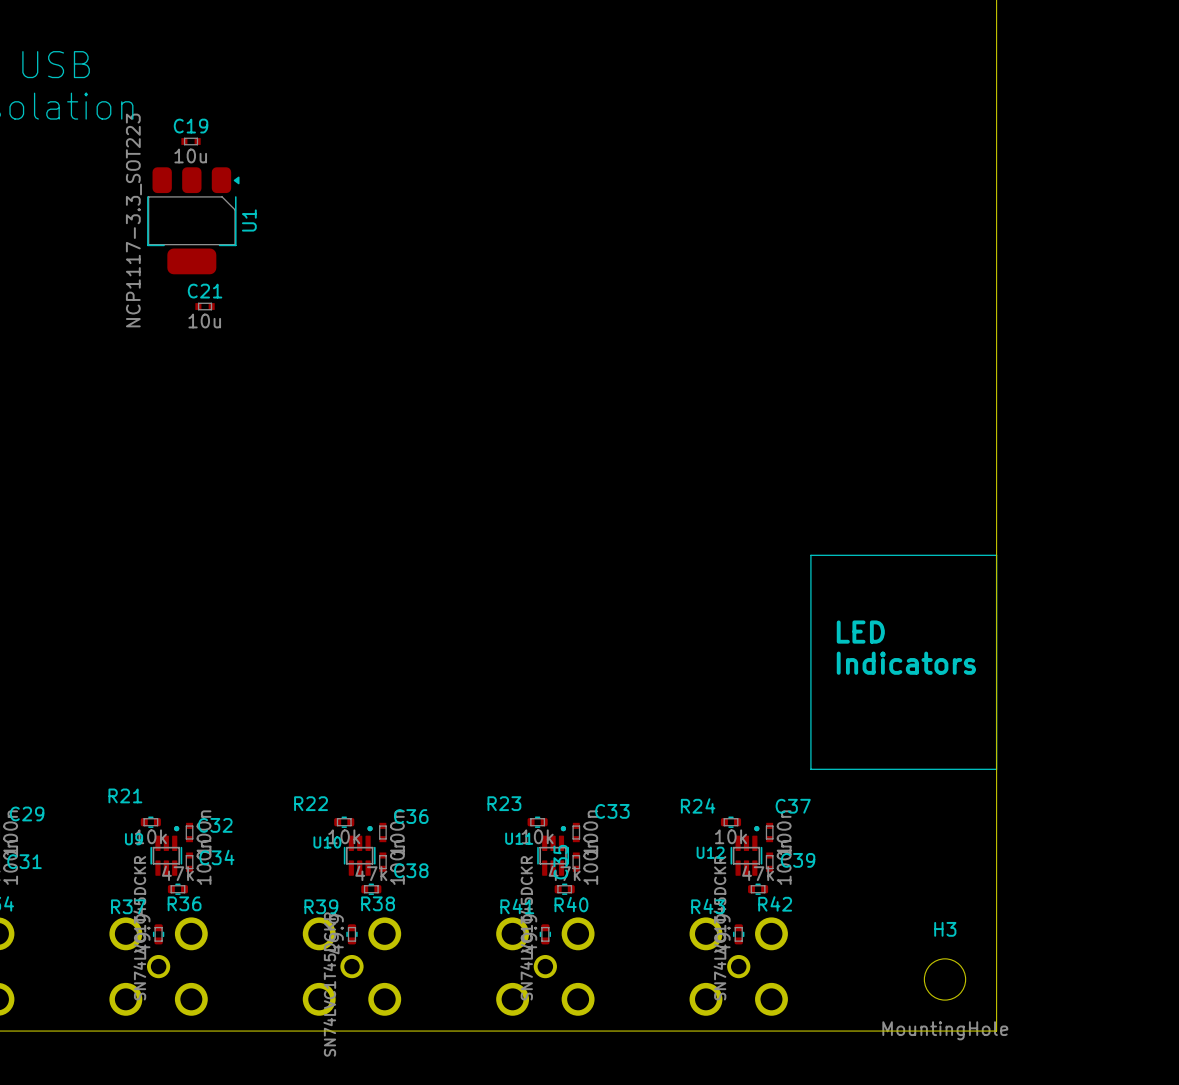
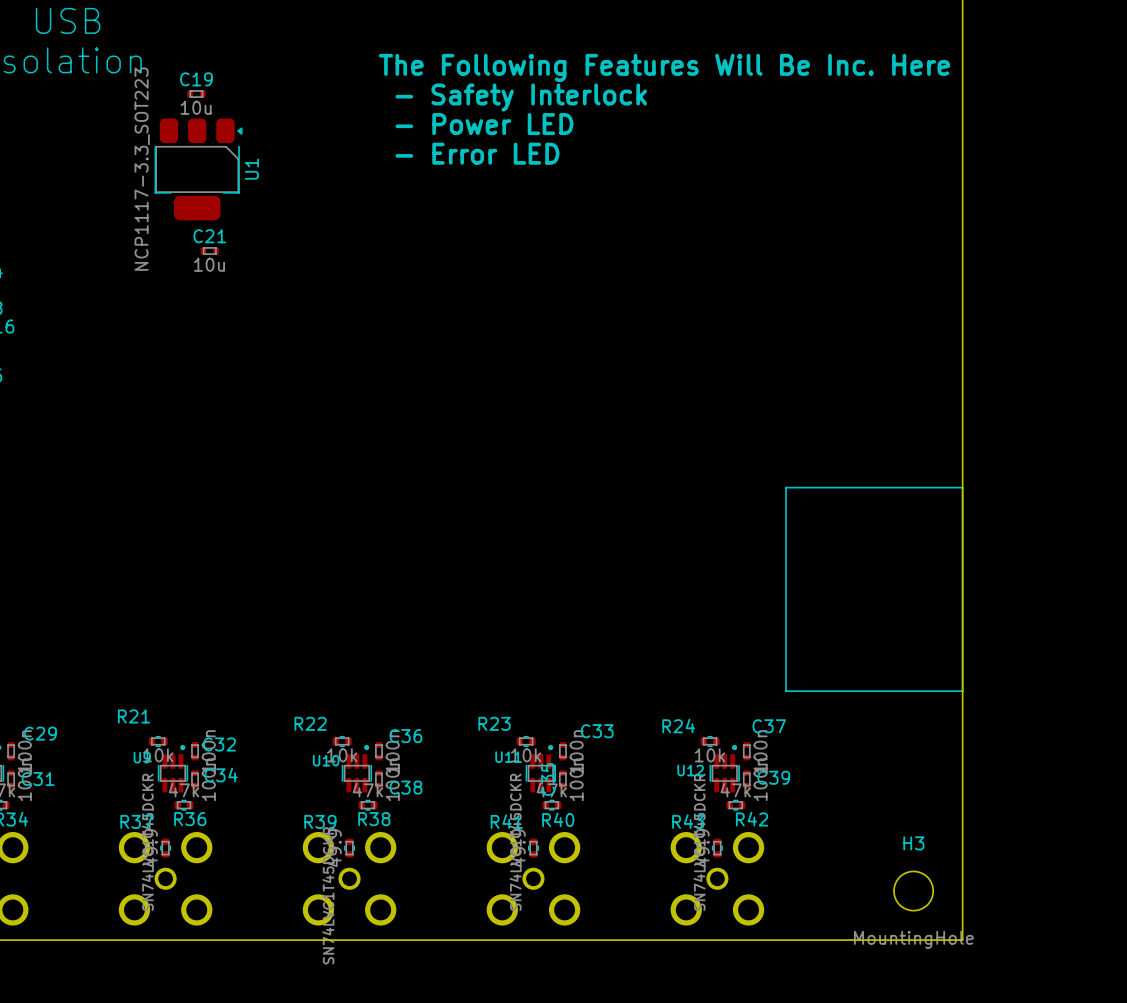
text: none -> The Following Features Will Be Inc. Here (664, 67)
text: none -> - Safety Interlock (521, 97)
text: none -> - Power LED (484, 124)
text: none -> - Error LED (477, 153)
text: LED (860, 632) -> none
text: Indicators (906, 663) -> none

